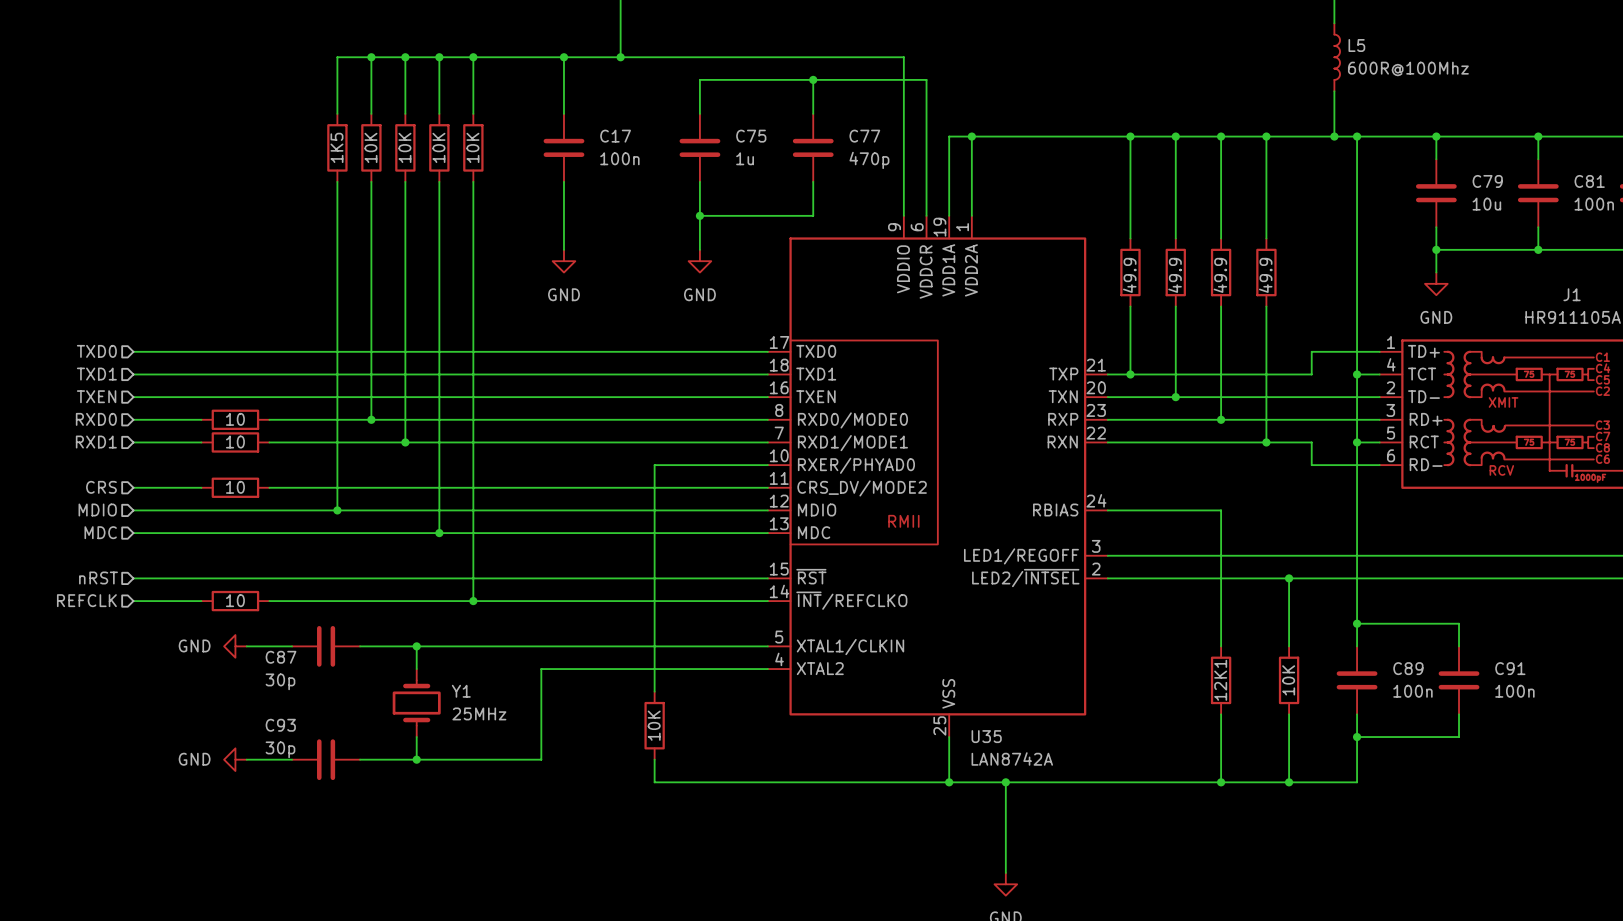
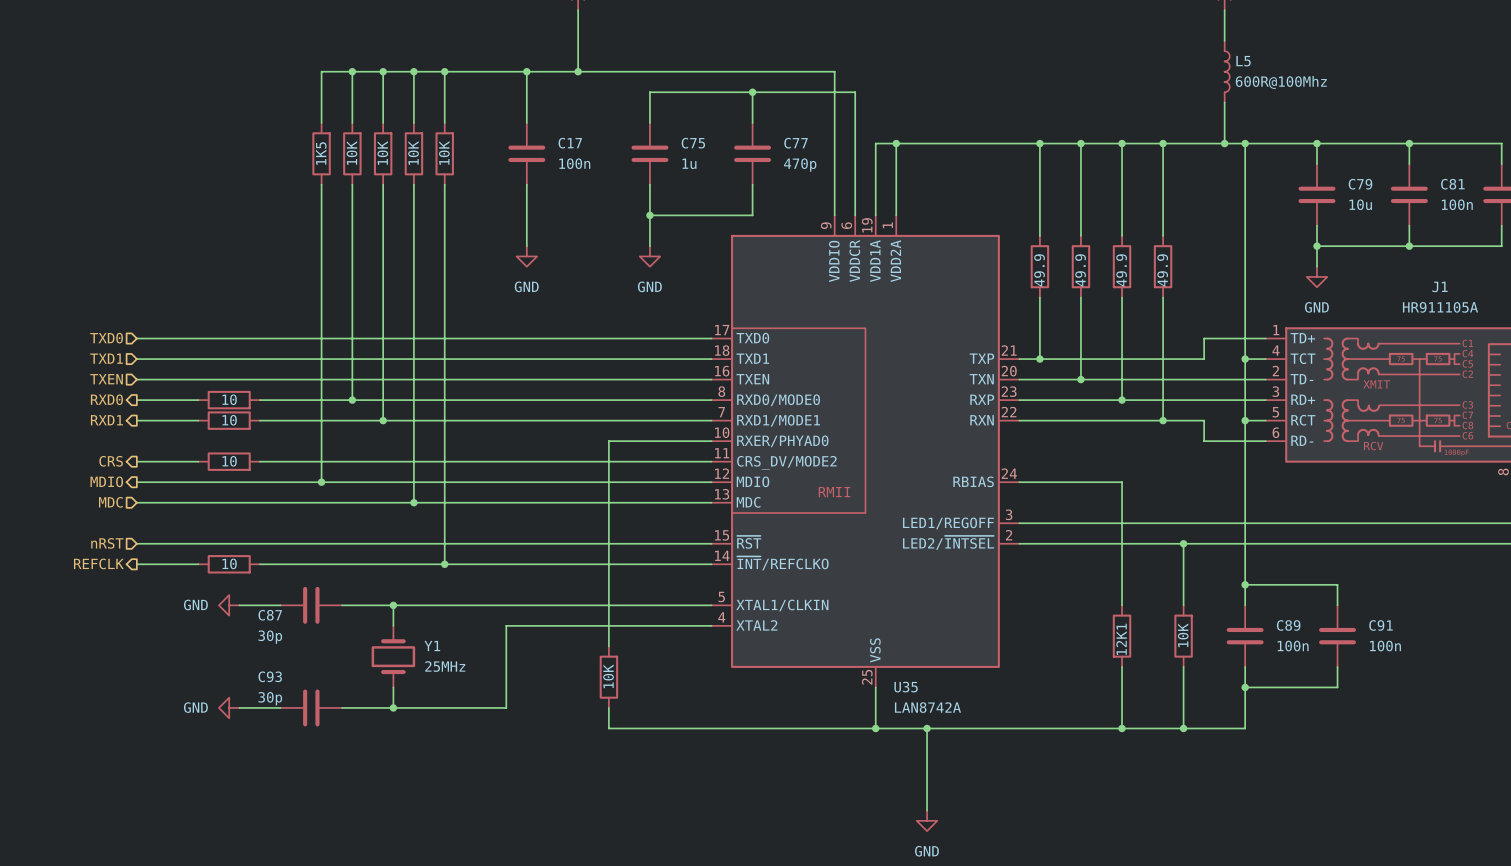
hierarchical label shape: input (96, 419) -> output (106, 399)
hierarchical label shape: input (96, 442) -> output (106, 420)
hierarchical label shape: input (101, 487) -> output (111, 461)
hierarchical label shape: input (97, 510) -> output (106, 481)
hierarchical label shape: input (86, 600) -> output (98, 563)

